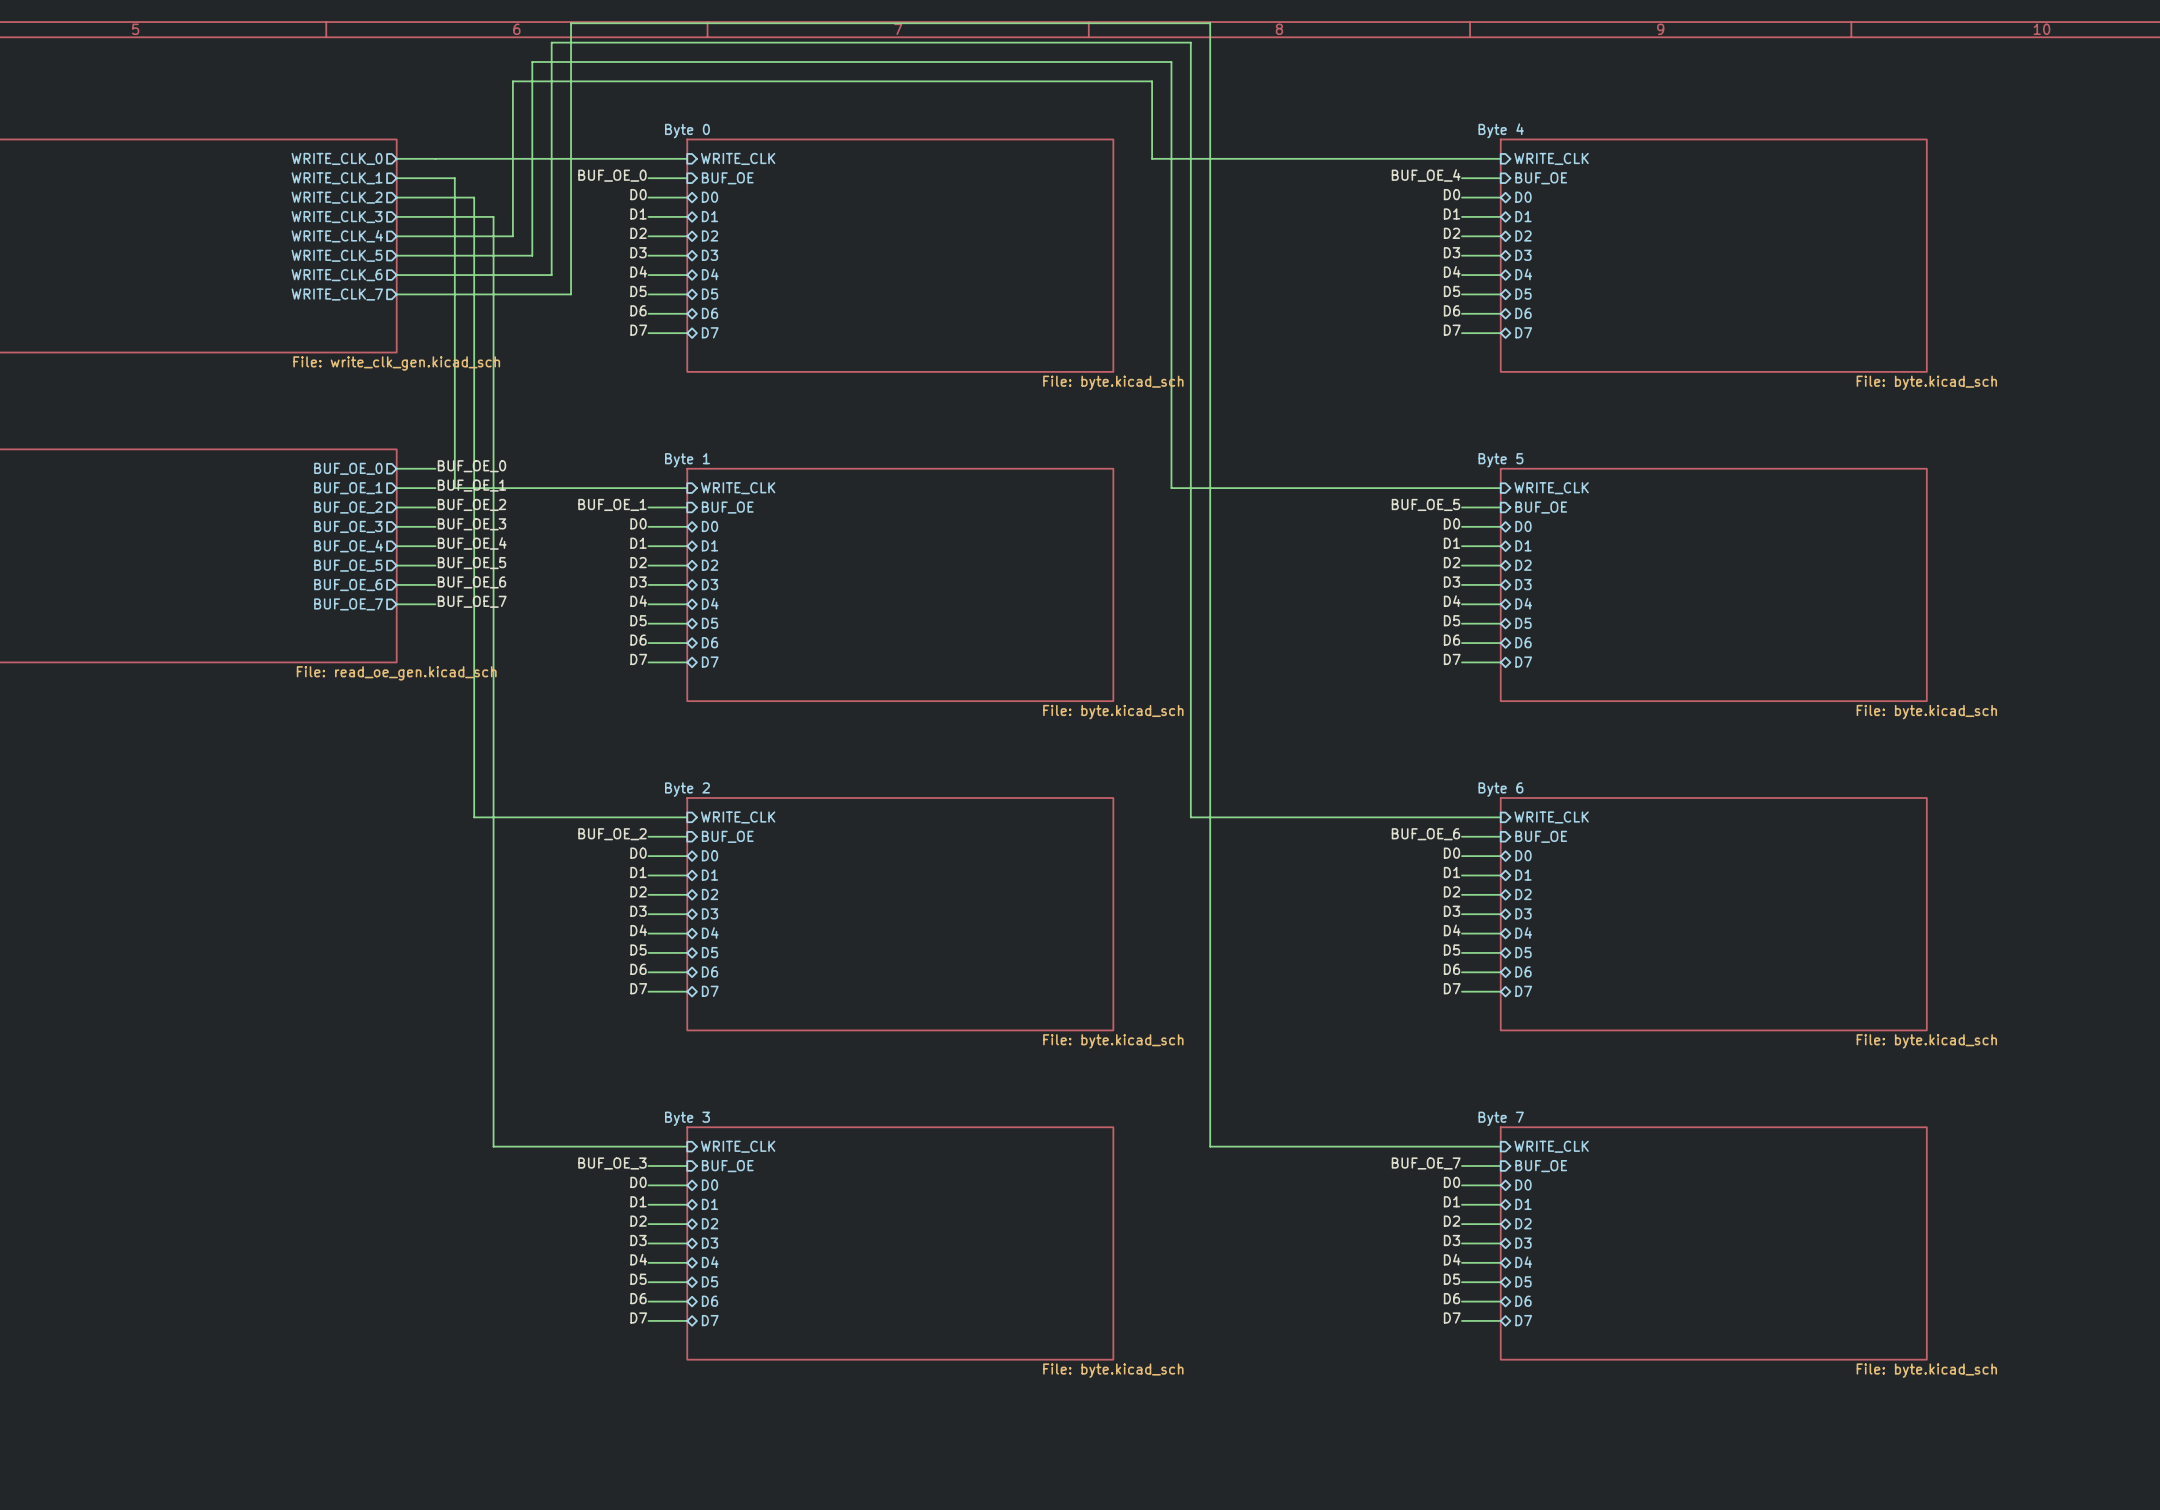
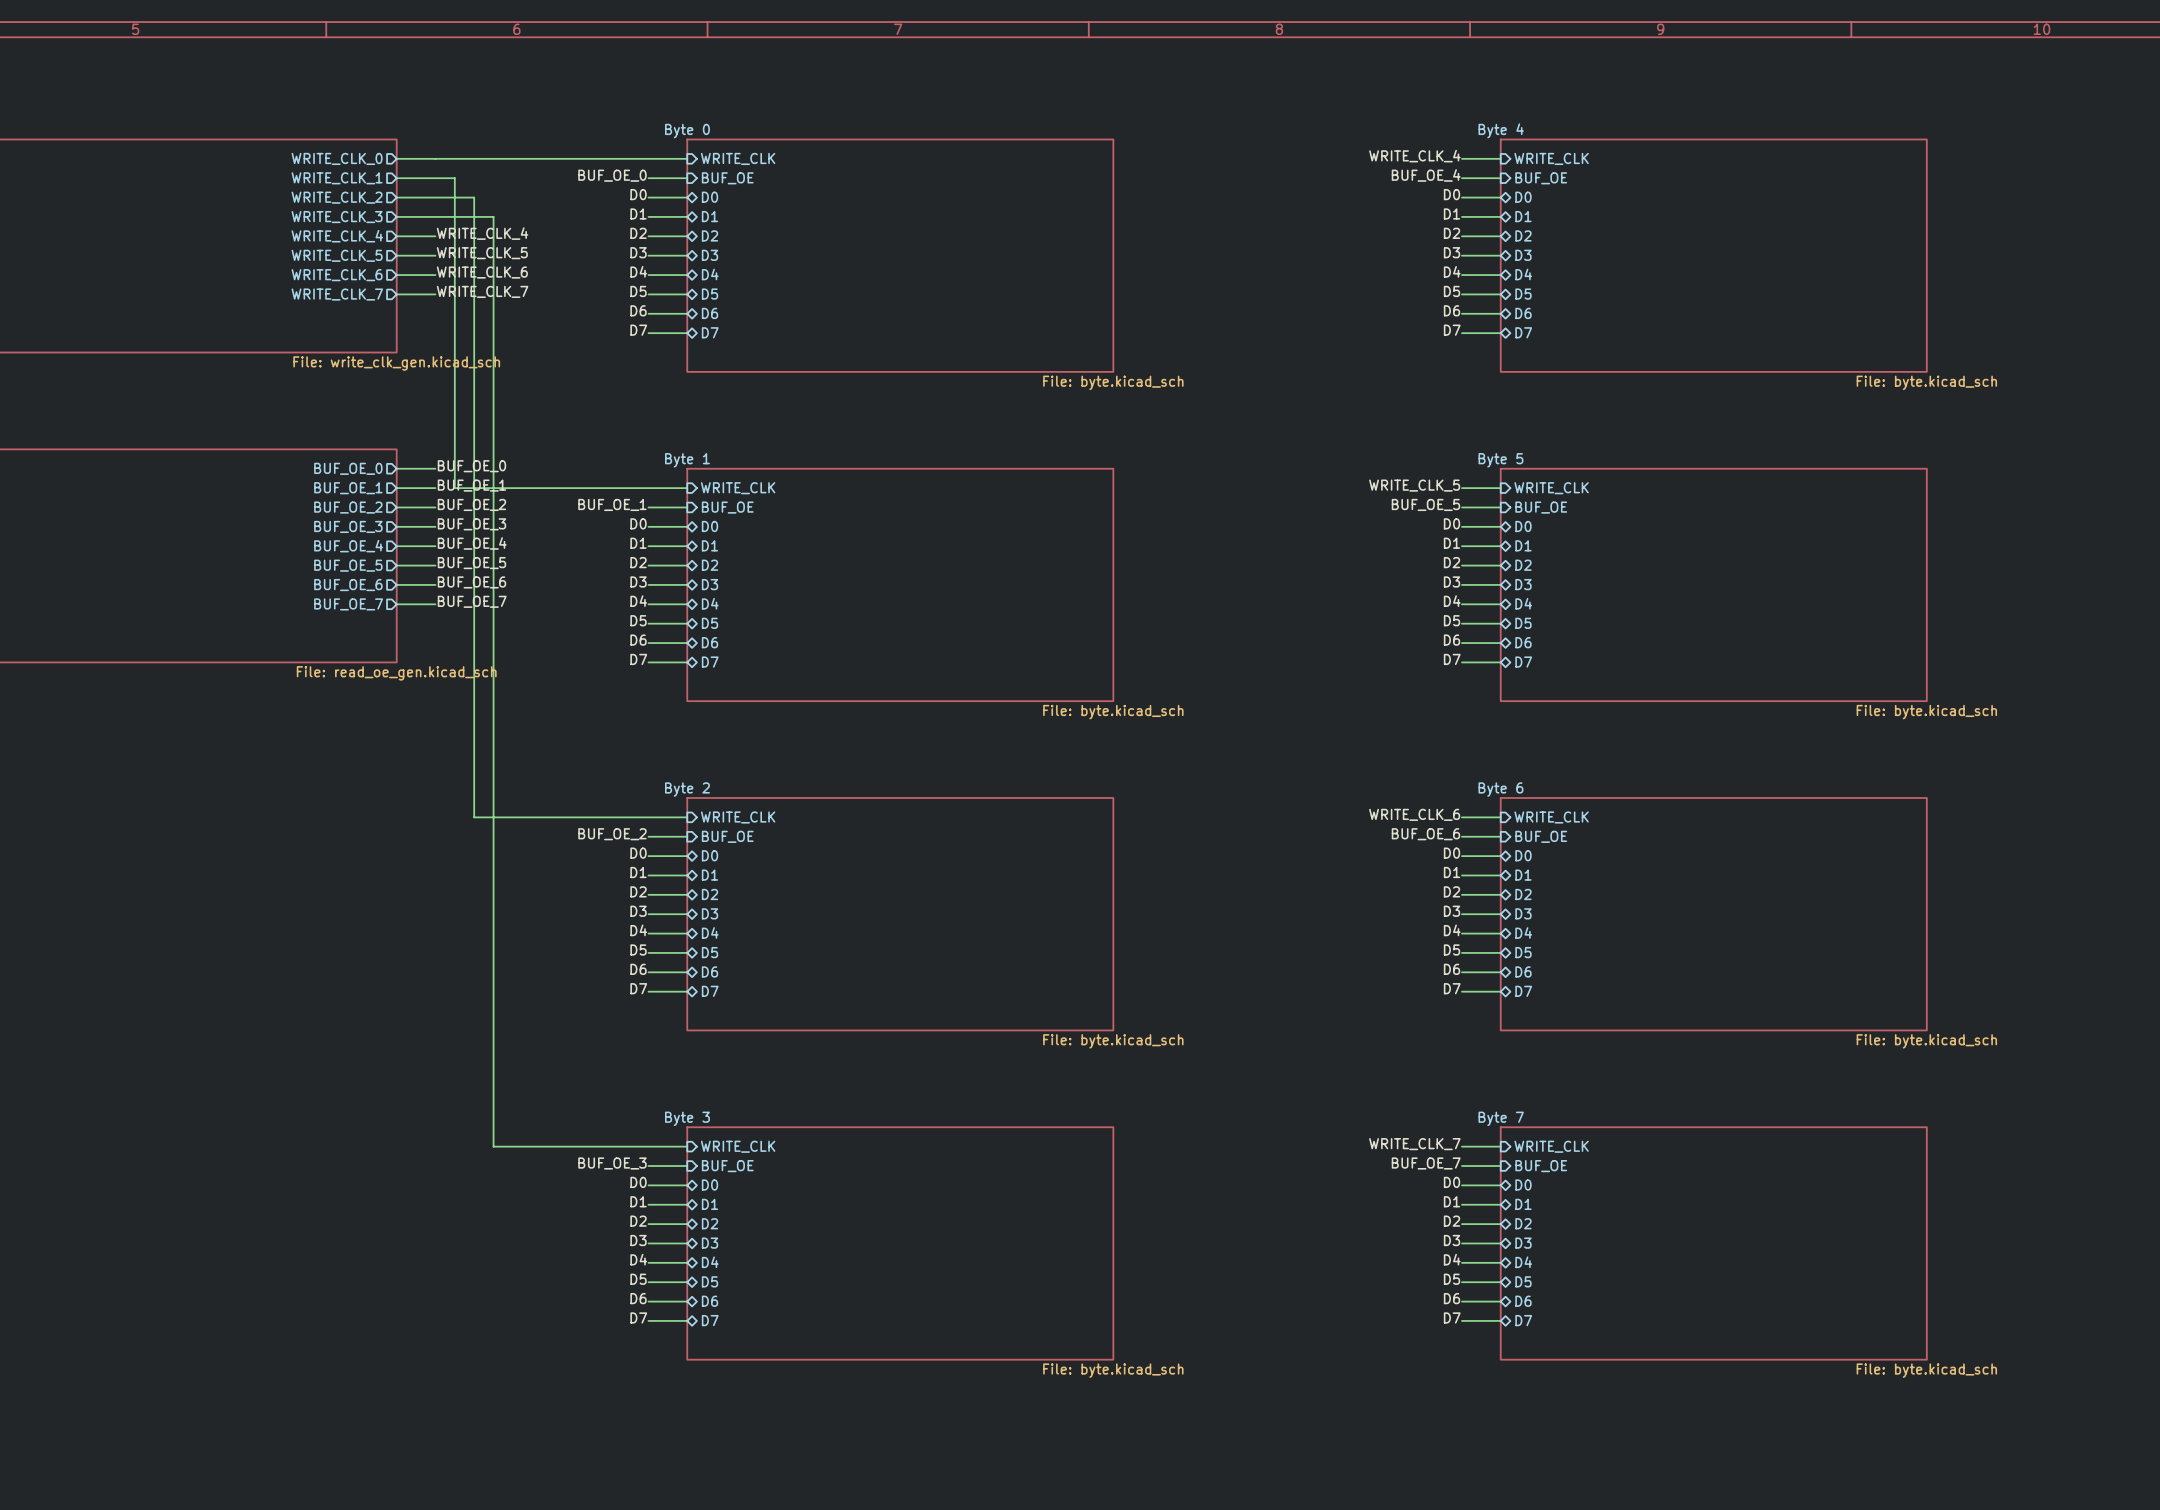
label: none -> WRITE_CLK_4 (1414, 156)
wire: (1461, 158) (1152, 158) (1152, 81) (512, 81) (512, 236) (435, 236) -> none
label: none -> WRITE_CLK_4 (482, 233)
label: none -> WRITE_CLK_5 (482, 253)
wire: (435, 255) (532, 255) (532, 61) (1171, 61) (1171, 488) (1461, 488) -> none
label: none -> WRITE_CLK_6 (482, 272)
wire: (435, 275) (551, 275) (551, 42) (1190, 42) (1190, 817) (1461, 817) -> none
label: none -> WRITE_CLK_7 (482, 291)
wire: (435, 294) (571, 294) (571, 23) (1210, 23) (1210, 1146) (1461, 1146) -> none
label: none -> WRITE_CLK_5 (1414, 485)
label: none -> WRITE_CLK_6 (1414, 814)
label: none -> WRITE_CLK_7 (1414, 1144)

